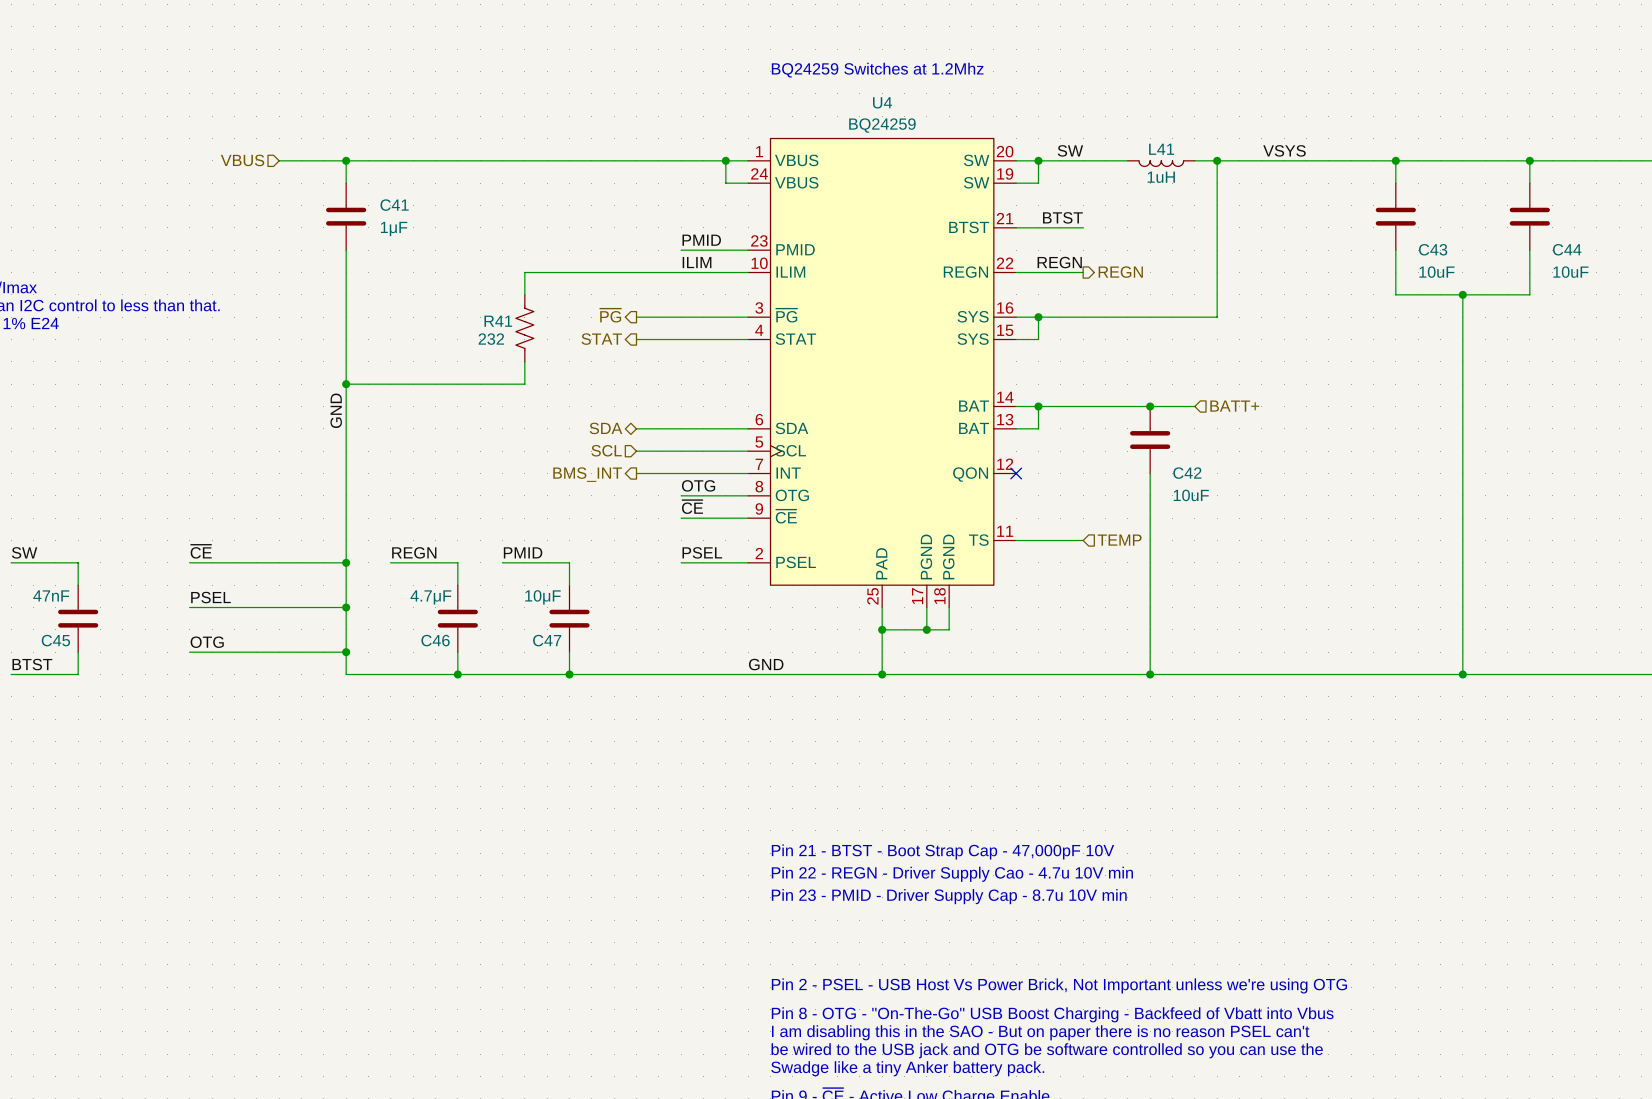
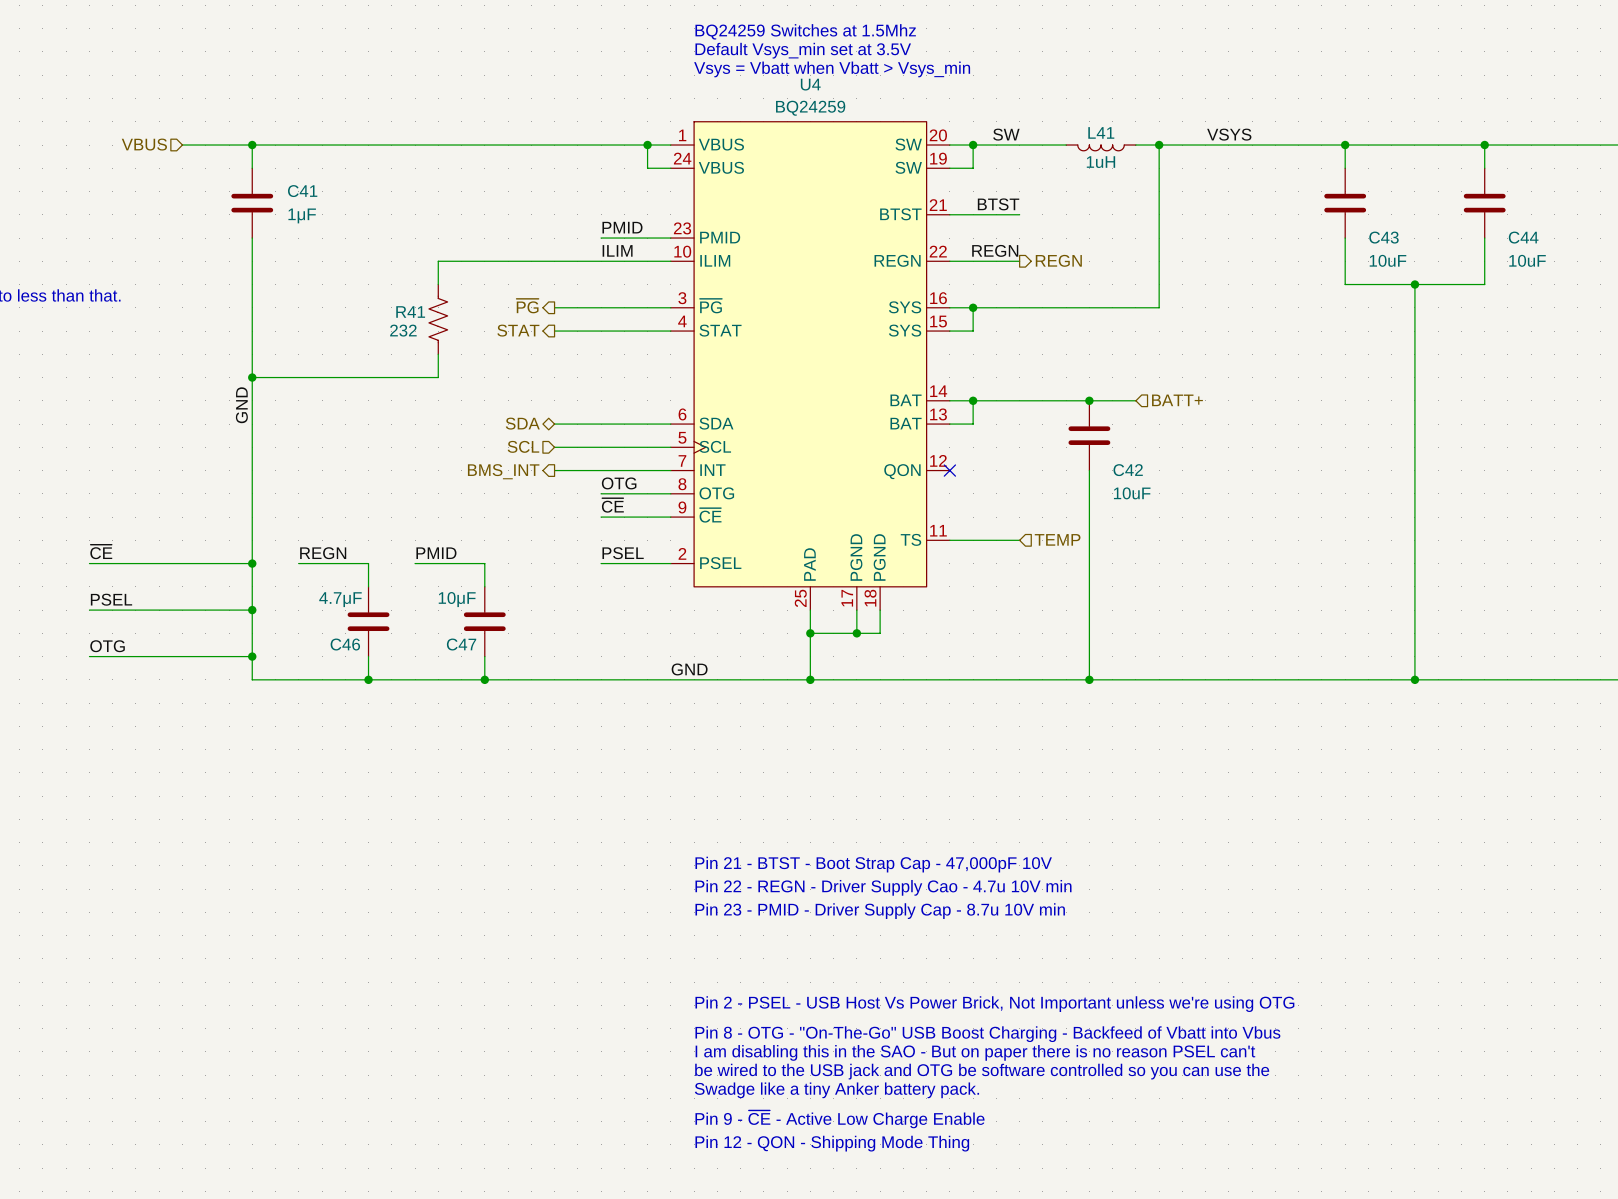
text: none -> BQ24259 Switches at 1.5Mhz (805, 31)
text: BQ24259 Switches at 1.2Mhz (877, 70) -> Default Vsys_min set at 3.5V (803, 50)
text: none -> Vsys = Vbatt when Vbatt > Vsys_min (832, 69)

